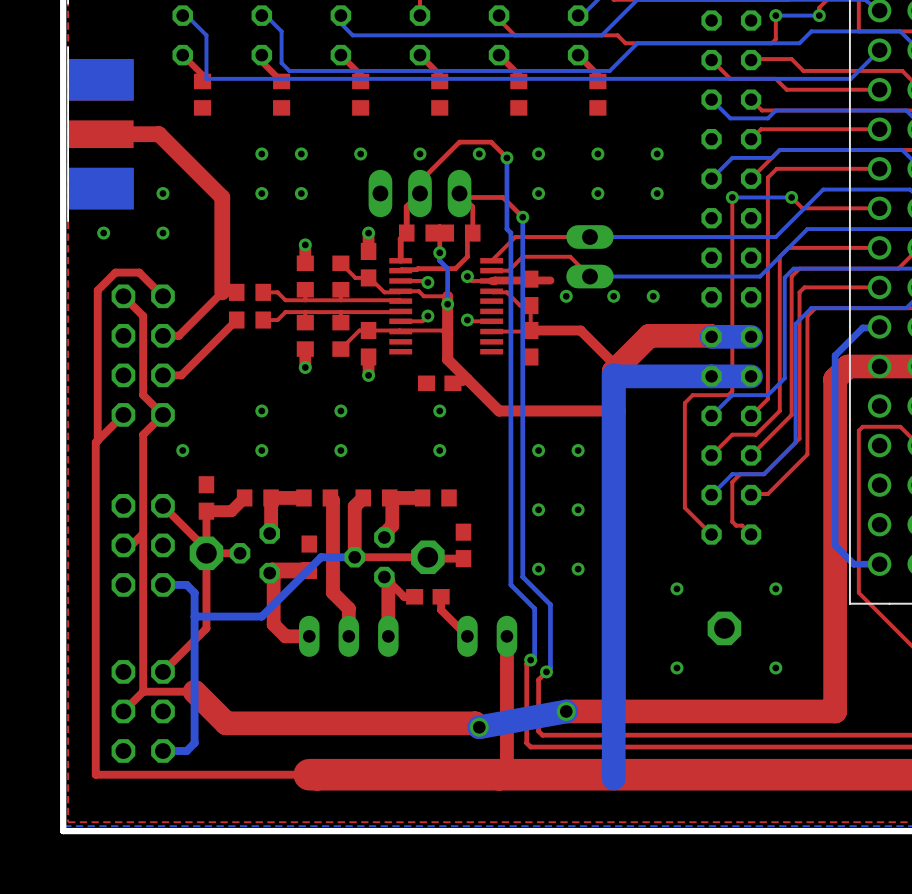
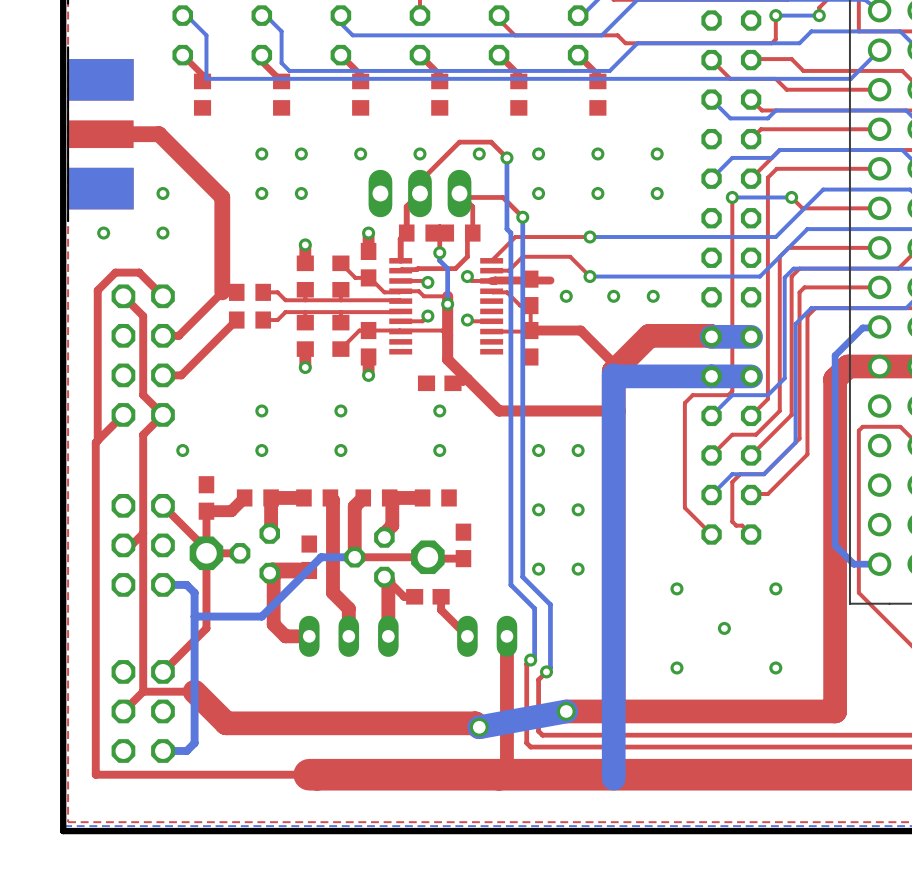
via: none -> (589, 237)
part: (589, 256) -> none
via: none -> (589, 276)
part: (724, 628) -> none
via: none -> (724, 628)

